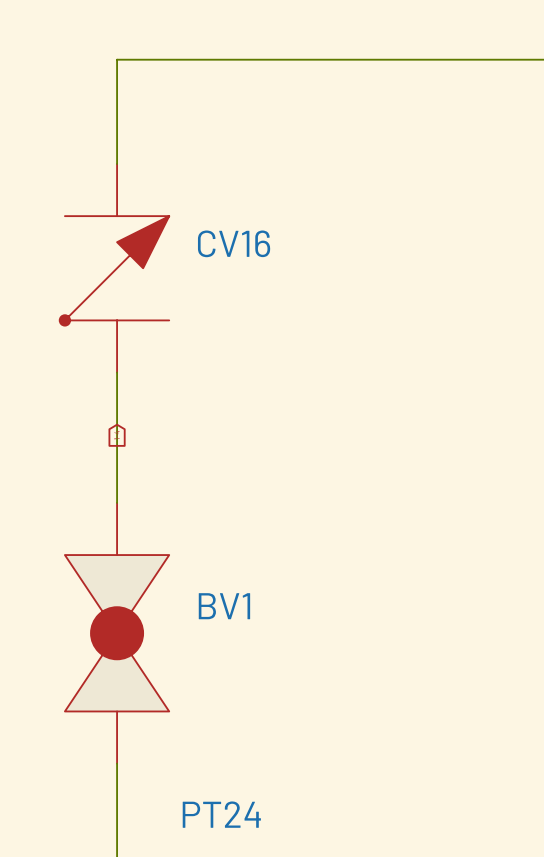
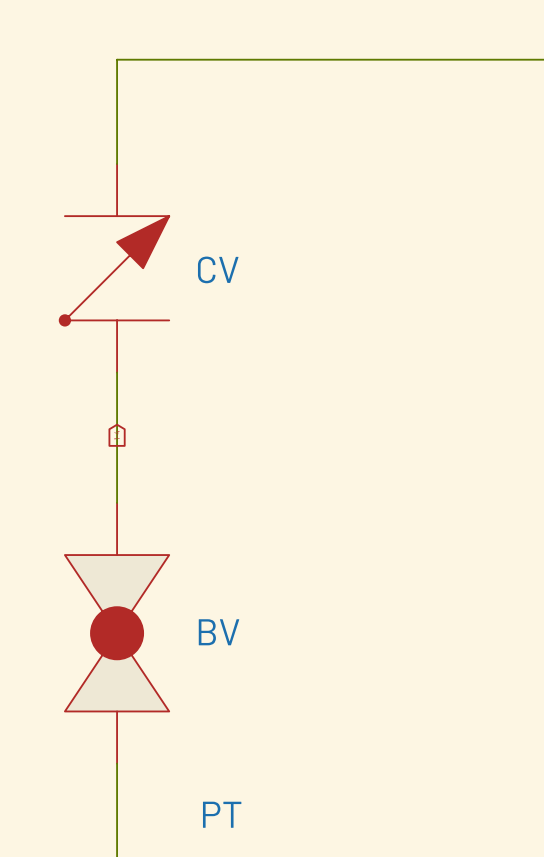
CV16 name: CV16 (234, 243) -> CV (218, 269)
BV1 name: BV1 (224, 606) -> BV (219, 632)
PT24 name: PT24 (221, 814) -> PT (222, 814)

